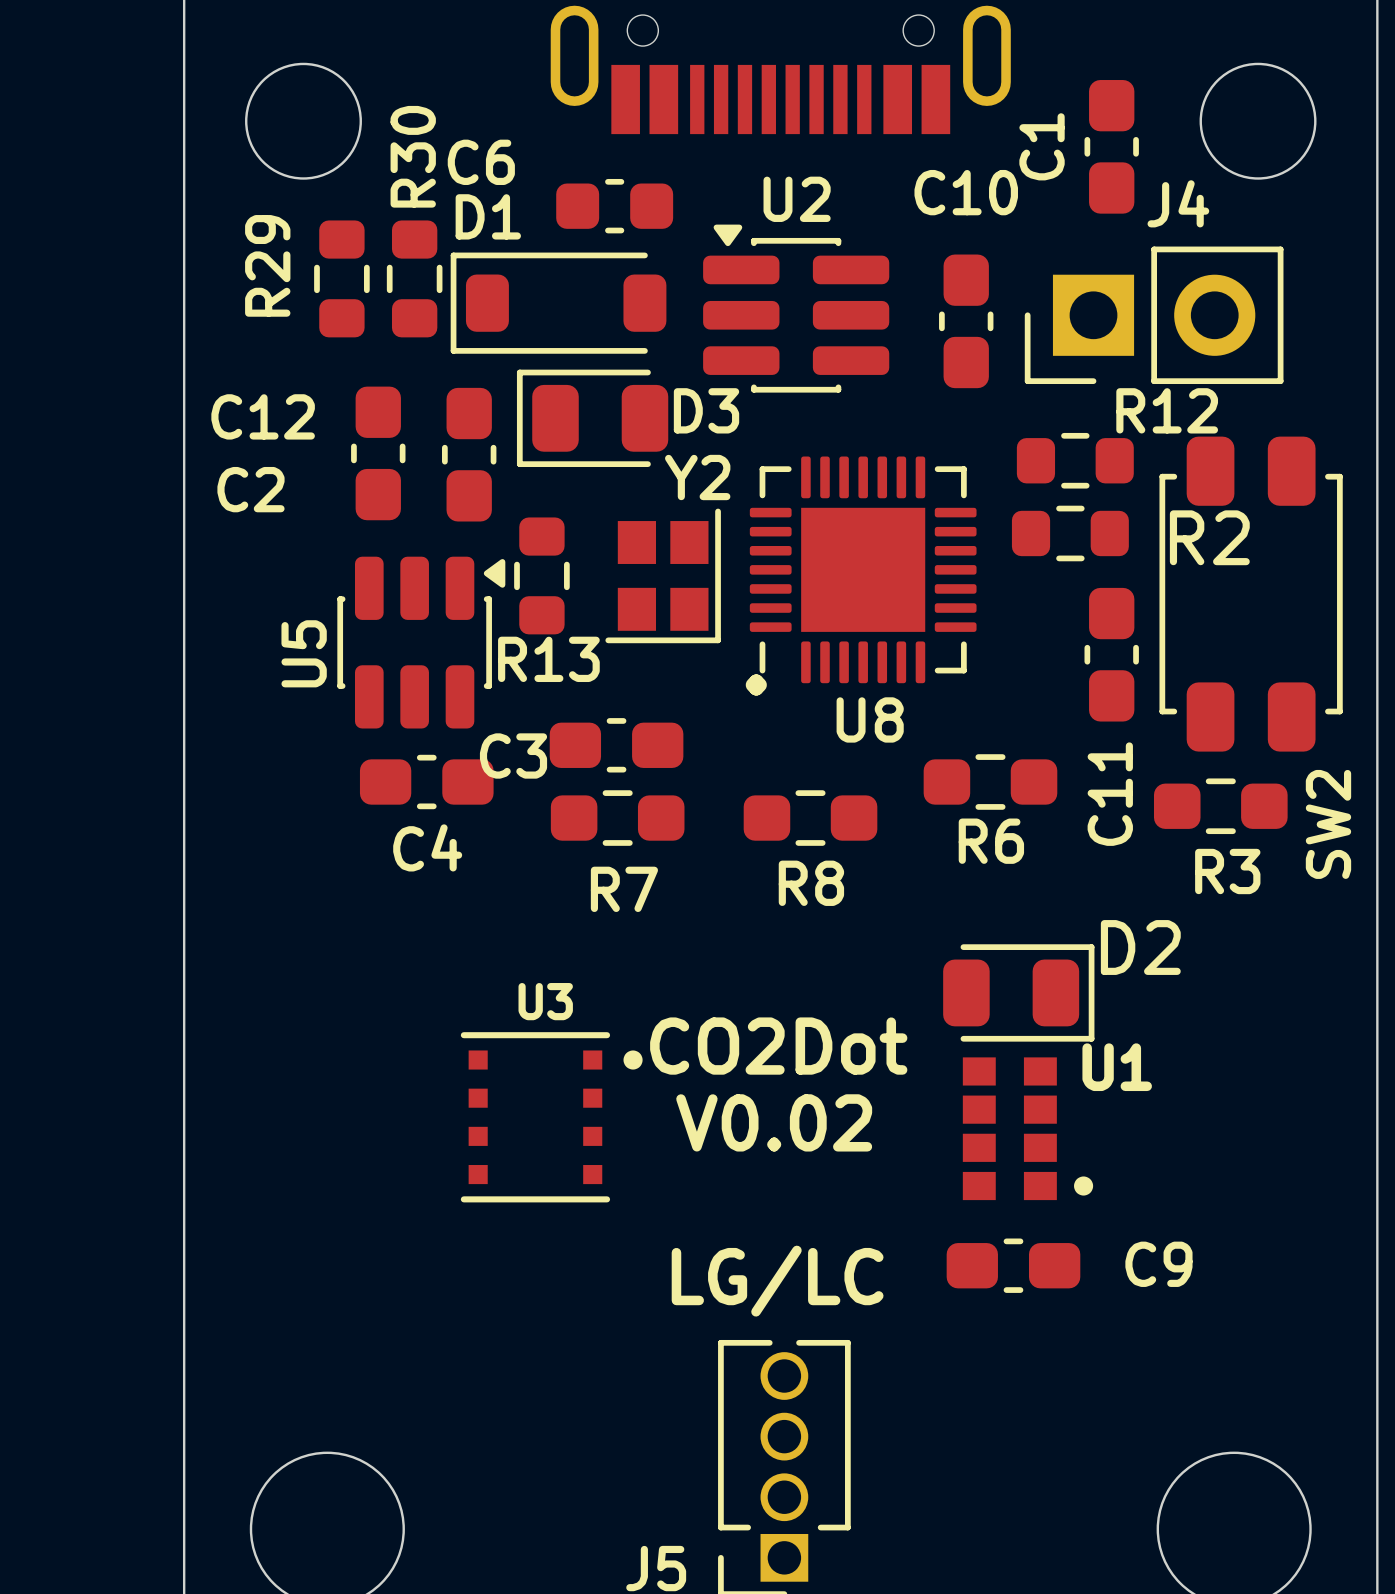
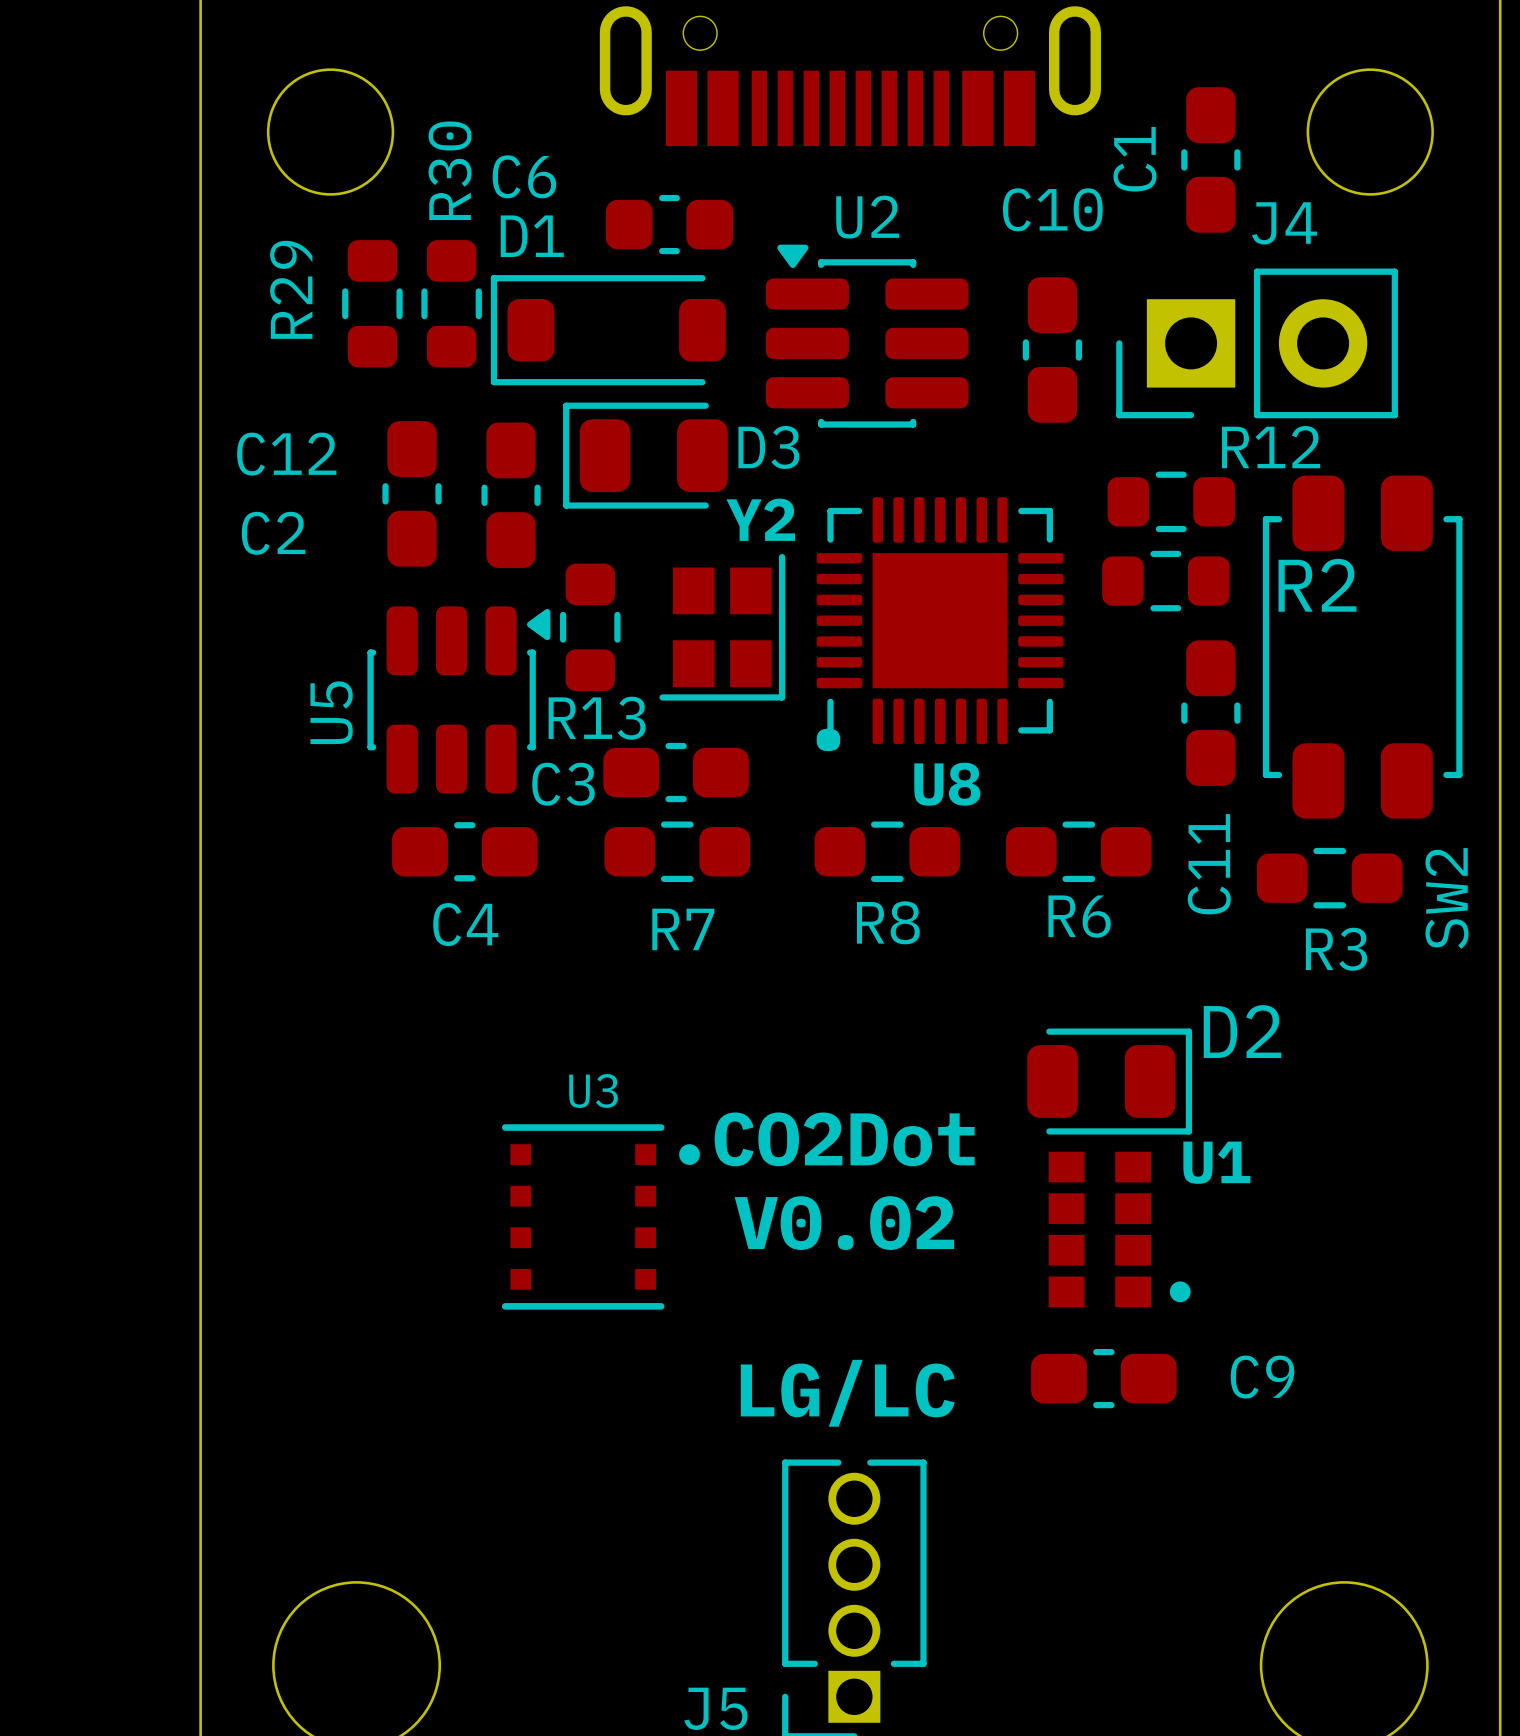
C3 position: (616, 745) -> (676, 772)
R7 position: (617, 818) -> (677, 851)
R8 position: (810, 818) -> (887, 851)

